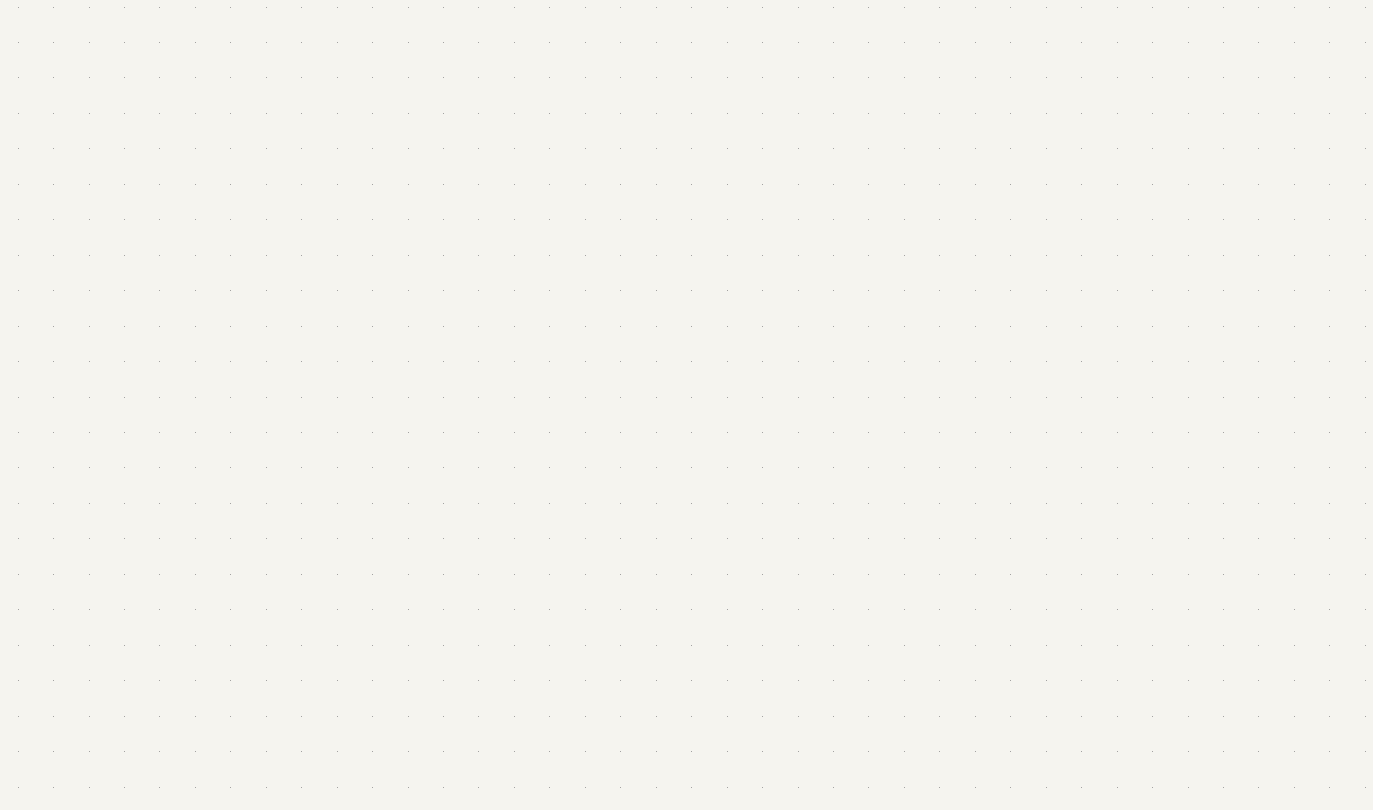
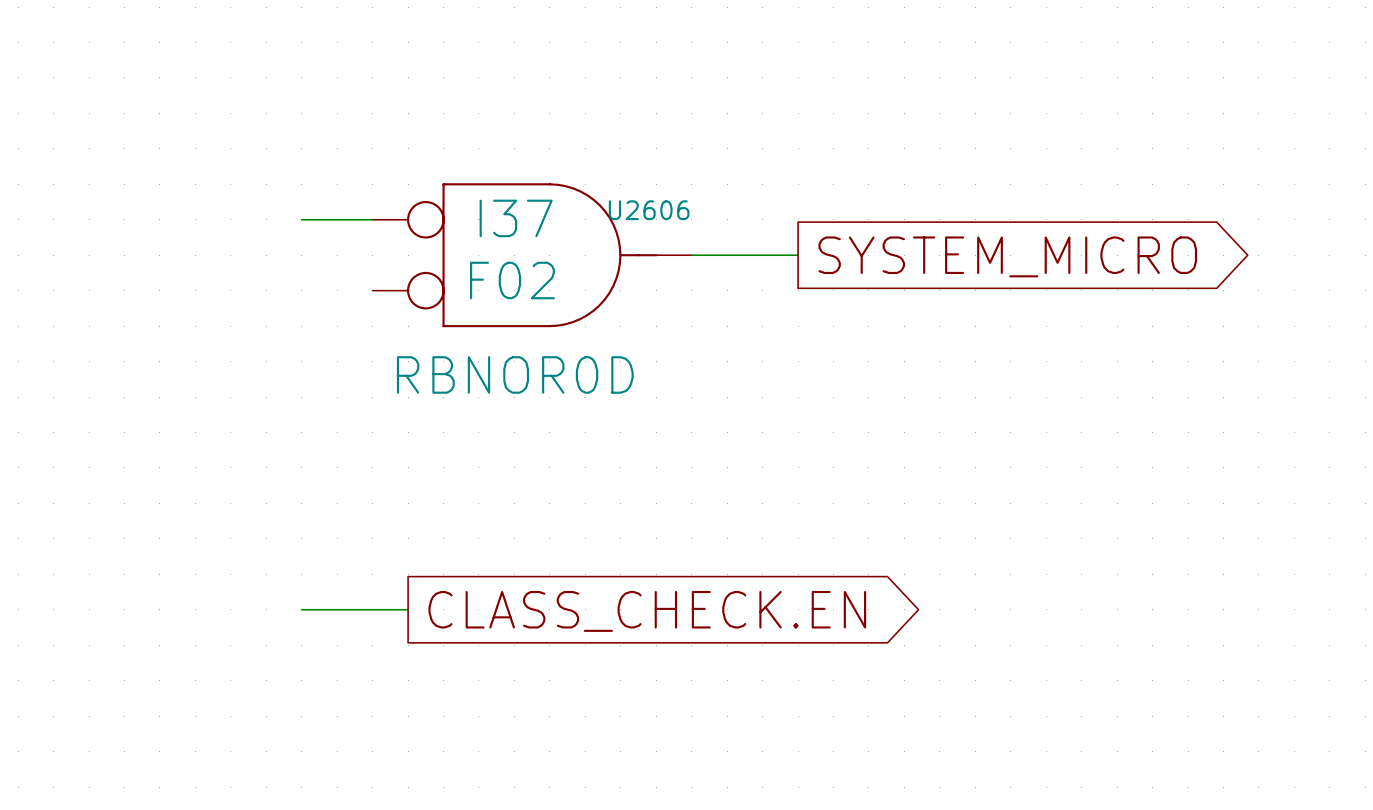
wire: none -> (301, 219) (372, 219)
U2606: none -> F02 (532, 255)
wire: none -> (691, 255) (798, 255)
global label: none -> SYSTEM_MICRO (1007, 256)
wire: none -> (301, 609) (408, 609)
global label: none -> CLASS_CHECK.EN (647, 611)

